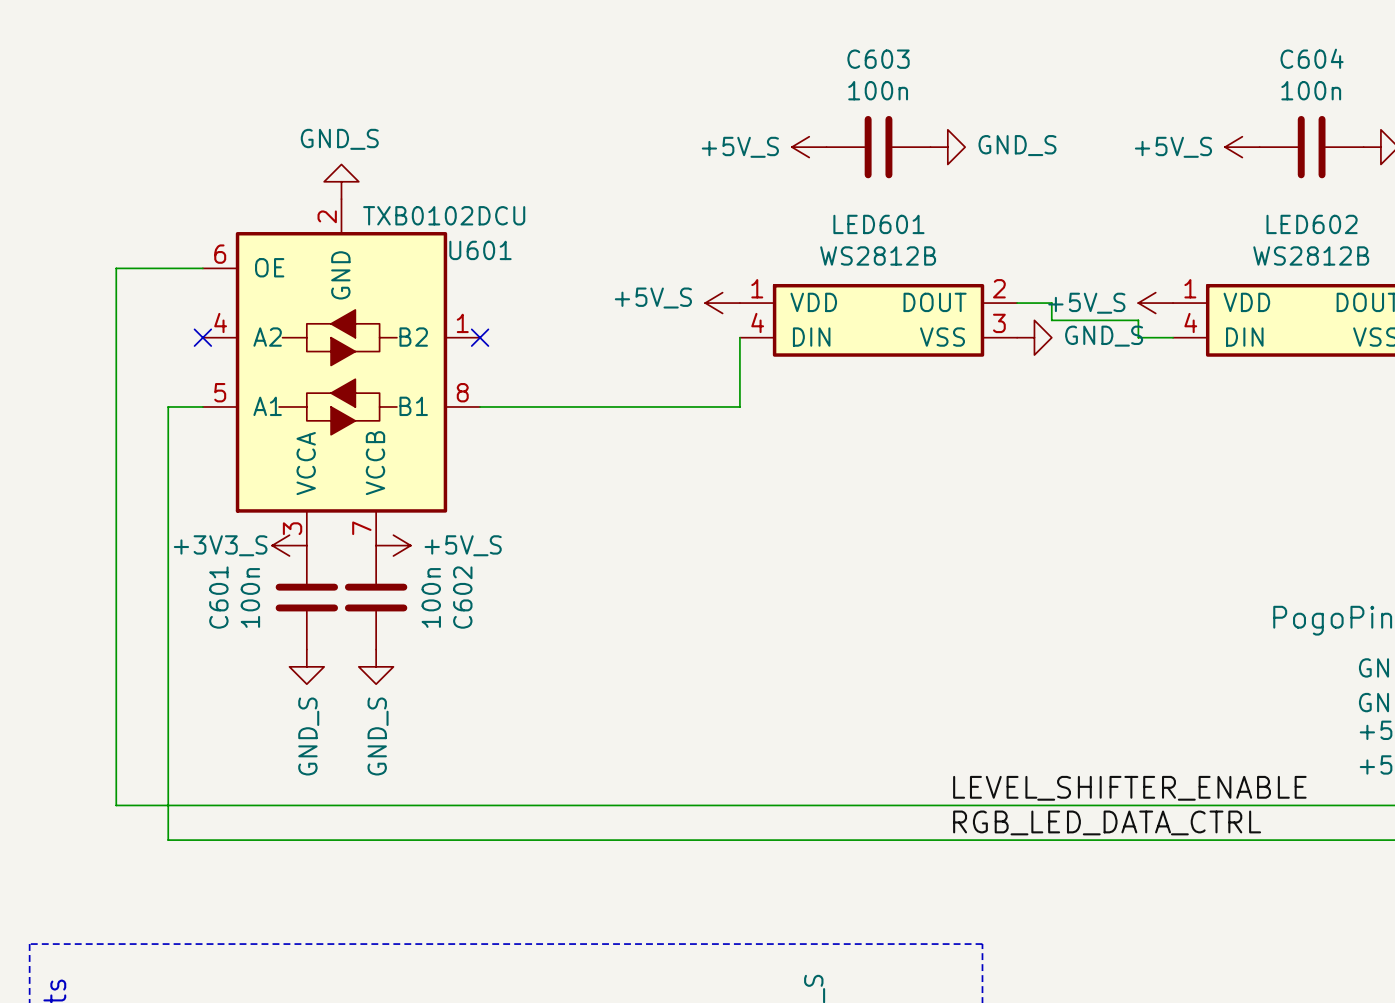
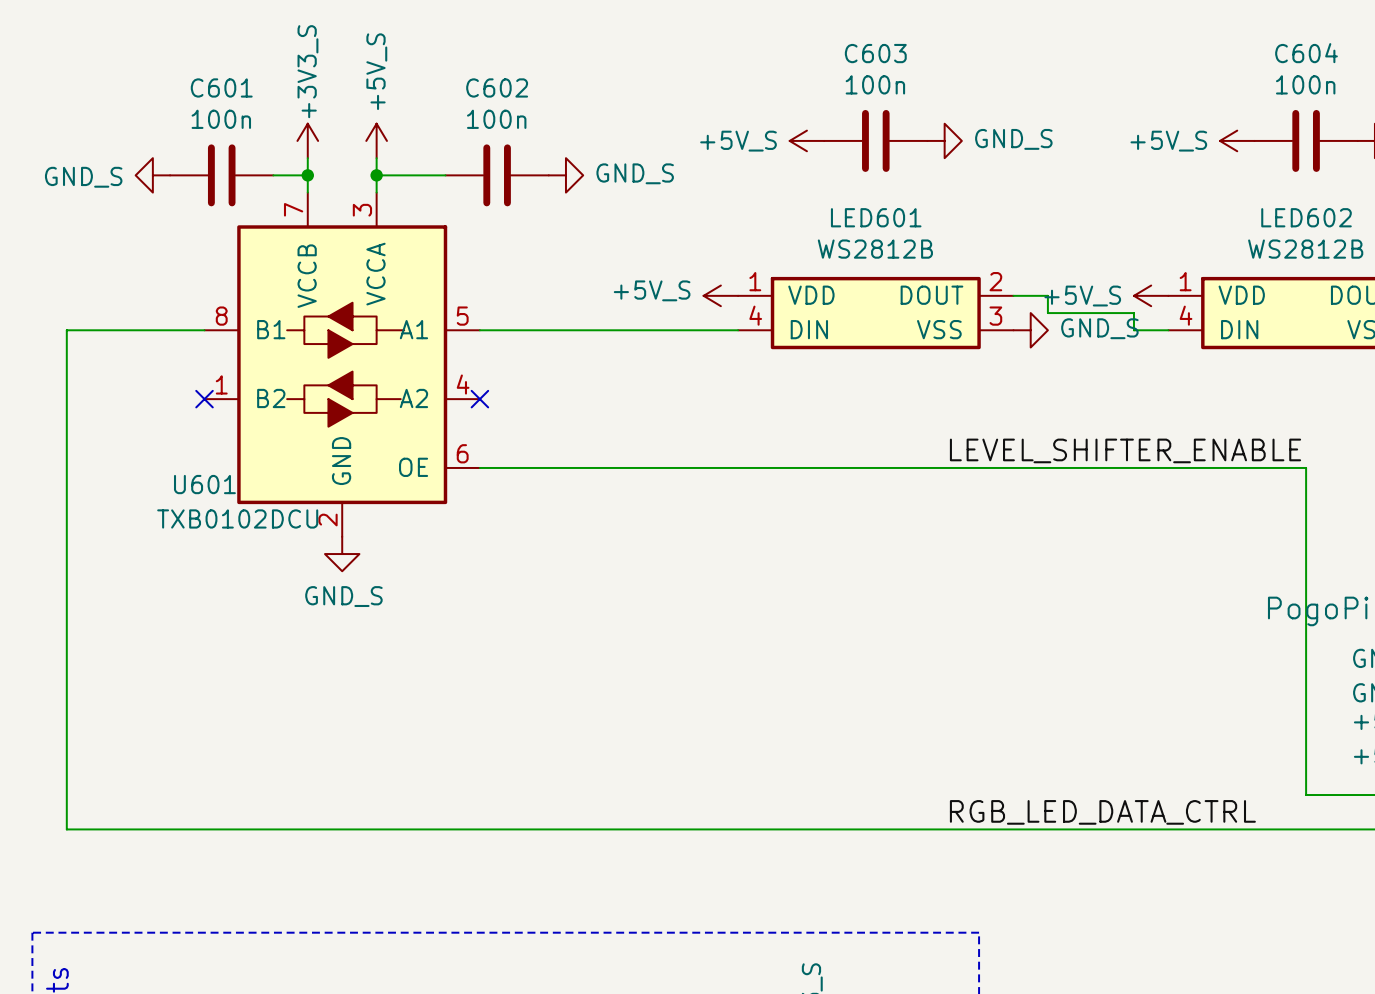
power symbol: none -> +3V3_S (307, 140)
power symbol: none -> +5V_S (376, 140)
wire: none -> (307, 158) (307, 192)
wire: none -> (376, 158) (376, 192)
power symbol: none -> GND_S (152, 175)
wire: none -> (273, 175) (307, 175)
junction: none -> (307, 175)
power symbol: GND_S (341, 181) -> none
wire: none -> (376, 175) (445, 175)
junction: none -> (376, 175)
power symbol: none -> GND_S (565, 175)
wire: (202, 268) (116, 268) (116, 805) (1311, 805) -> (479, 467) (1306, 467) (1306, 795)
no-connect mark position: (202, 337) -> (204, 399)
no-connect mark position: (480, 337) -> (479, 399)
wire: (739, 337) (739, 406) (480, 406) -> (738, 330) (479, 330)
U601 rotation: 0° (341, 372) -> 180° (342, 364)
wire: (202, 406) (168, 406) (168, 840) -> (204, 330) (66, 330) (66, 829) (170, 829)
power symbol: +3V3_S (289, 545) -> none
power symbol: +5V_S (393, 545) -> none
power symbol: none -> GND_S (342, 554)
C601 rotation: 0° (306, 597) -> 90° clockwise (221, 175)
C601 position: (306, 597) -> (221, 175)
C602 rotation: 0° (376, 597) -> 90° clockwise (497, 175)
C602 position: (376, 597) -> (497, 175)
C602 value position: 100n (431, 597) -> 100n (496, 119)
C602 name position: C602 (462, 597) -> C602 (497, 87)
power symbol: GND_S (306, 666) -> none
power symbol: GND_S (376, 666) -> none
label position: LEVEL_SHIFTER_ENABLE (1129, 788) -> LEVEL_SHIFTER_ENABLE (1125, 450)

